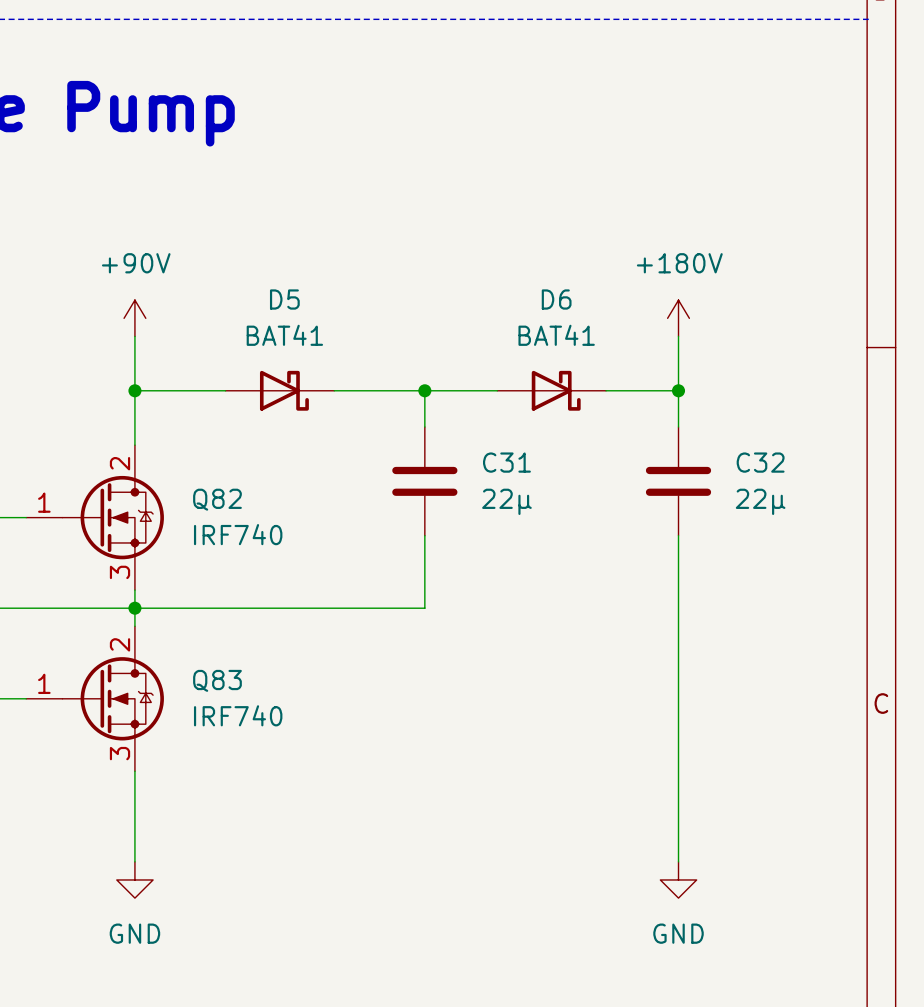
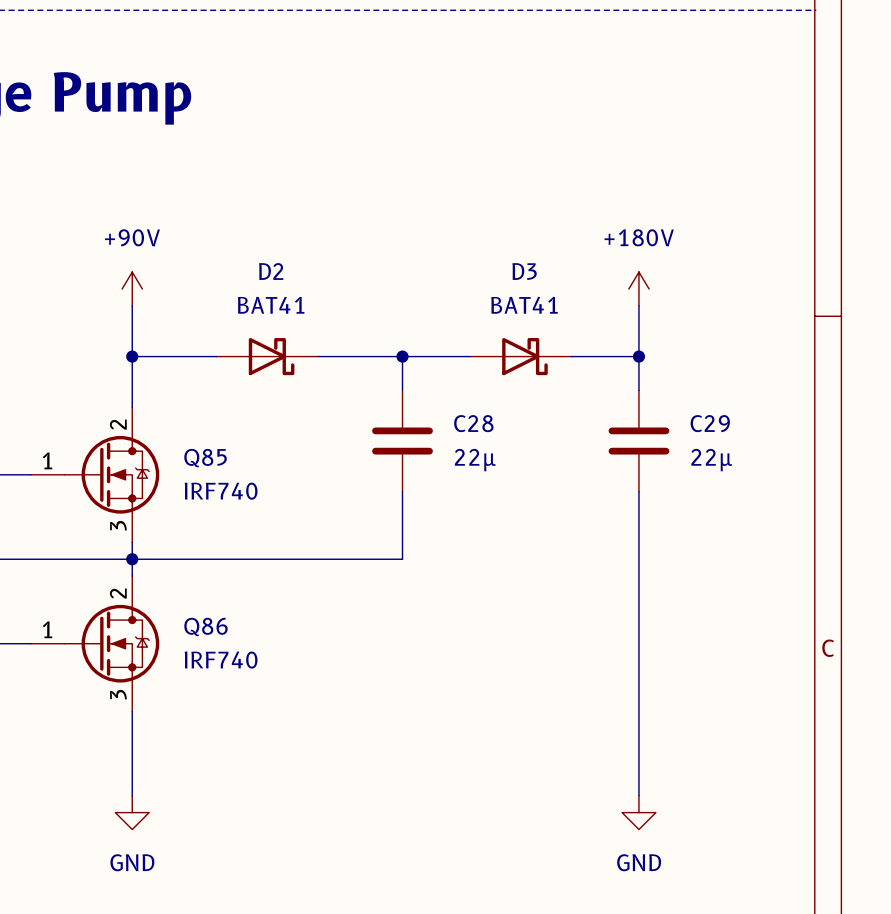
D5 name: D5 (284, 299) -> D2 (271, 271)
D6 name: D6 (556, 299) -> D3 (524, 271)
C31 name: C31 (506, 462) -> C28 (473, 423)
C32 name: C32 (760, 462) -> C29 (710, 423)
Q82 name: Q82 (217, 499) -> Q85 (205, 458)
Q83 name: Q83 (217, 680) -> Q86 (205, 627)

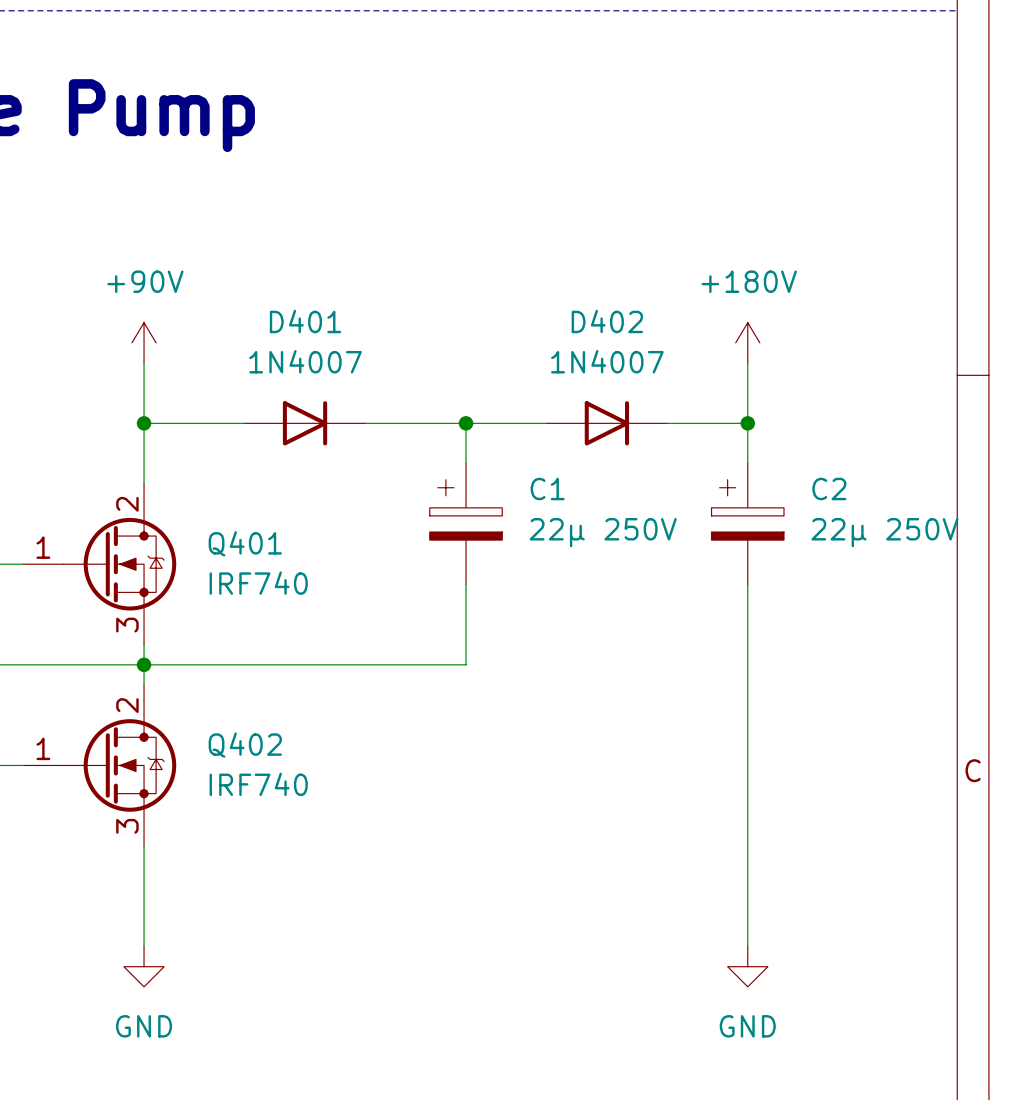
D2: BAT41 (267, 356) -> none
D401: none -> 1N4007 (305, 423)
D3: BAT41 (520, 356) -> none
D402: none -> 1N4007 (606, 423)
C28: 22µ (402, 441) -> none
C1: none -> 22µ 250V (466, 523)
C29: 22µ (638, 441) -> none
C2: none -> 22µ 250V (747, 523)
Q85 name: Q85 (205, 458) -> Q401 (245, 543)
Q86 name: Q86 (205, 627) -> Q402 (245, 745)

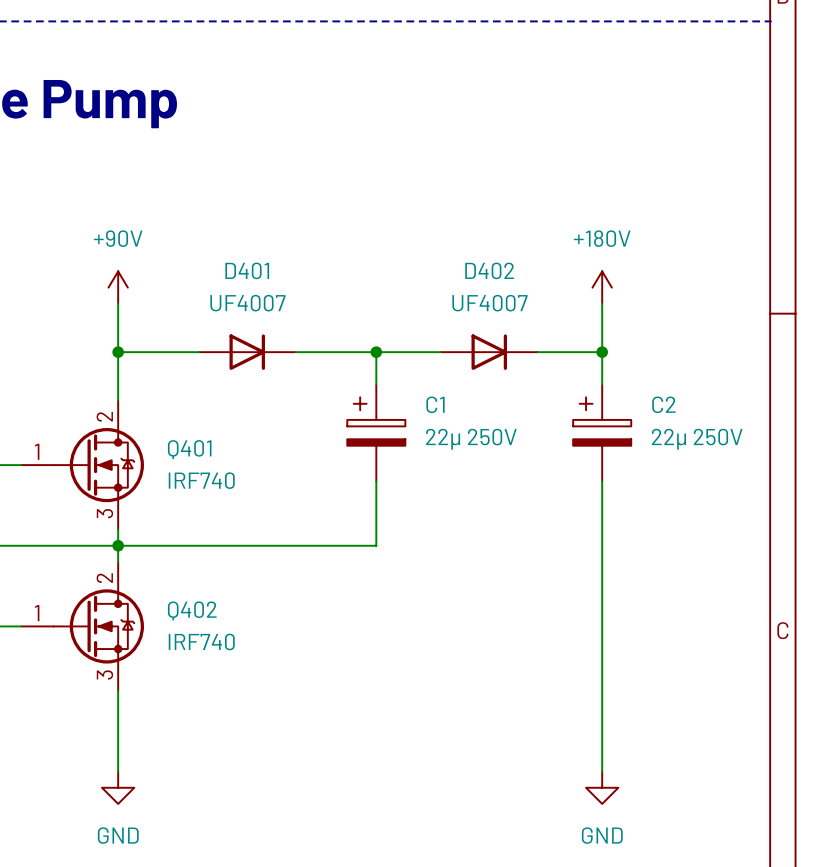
D401 value: 1N4007 (305, 361) -> UF4007 (247, 303)
D402 value: 1N4007 (607, 361) -> UF4007 (489, 303)

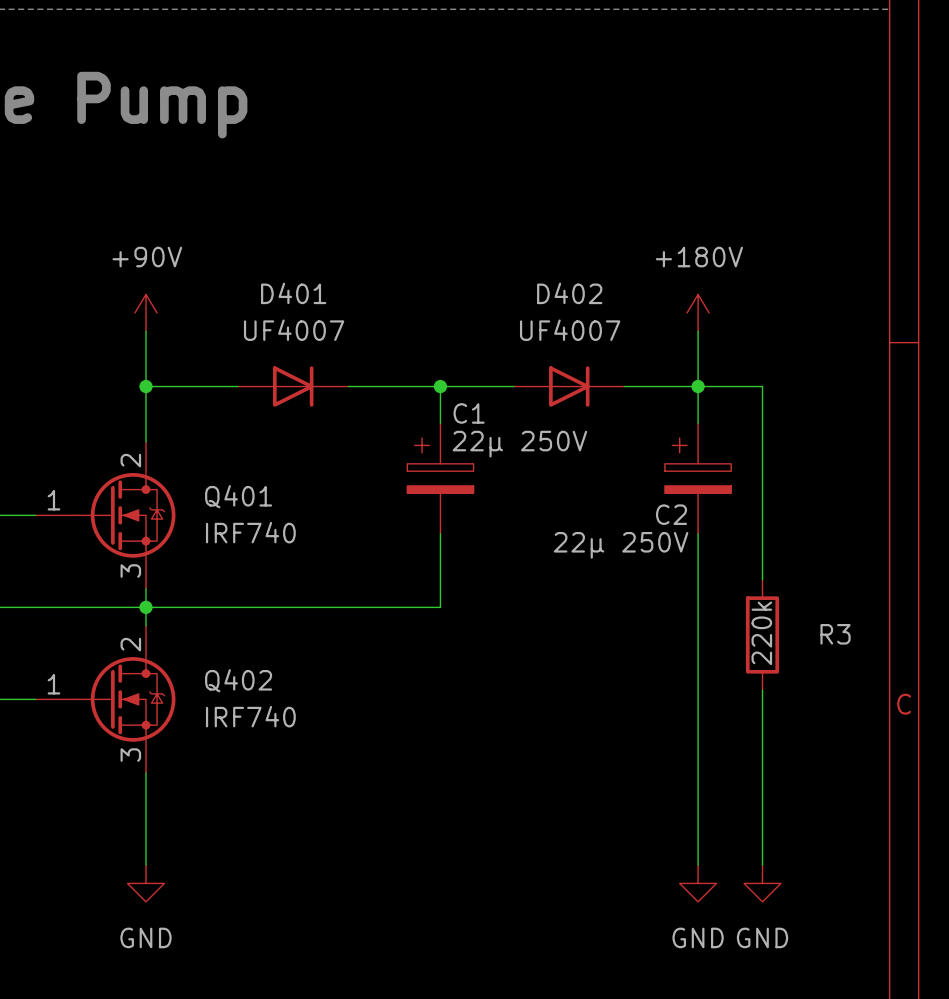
wire: none -> (698, 386) (762, 386) (762, 579)
C1 name position: C1 (435, 404) -> C1 (469, 413)
C2 name position: C2 (663, 404) -> C2 (671, 514)
C1 value position: 22µ 250V (471, 439) -> 22µ 250V (519, 444)
C2 value position: 22µ 250V (697, 439) -> 22µ 250V (621, 545)
R3: none -> 220k (762, 634)
wire: none -> (762, 690) (762, 865)
power symbol: none -> GND (762, 883)

